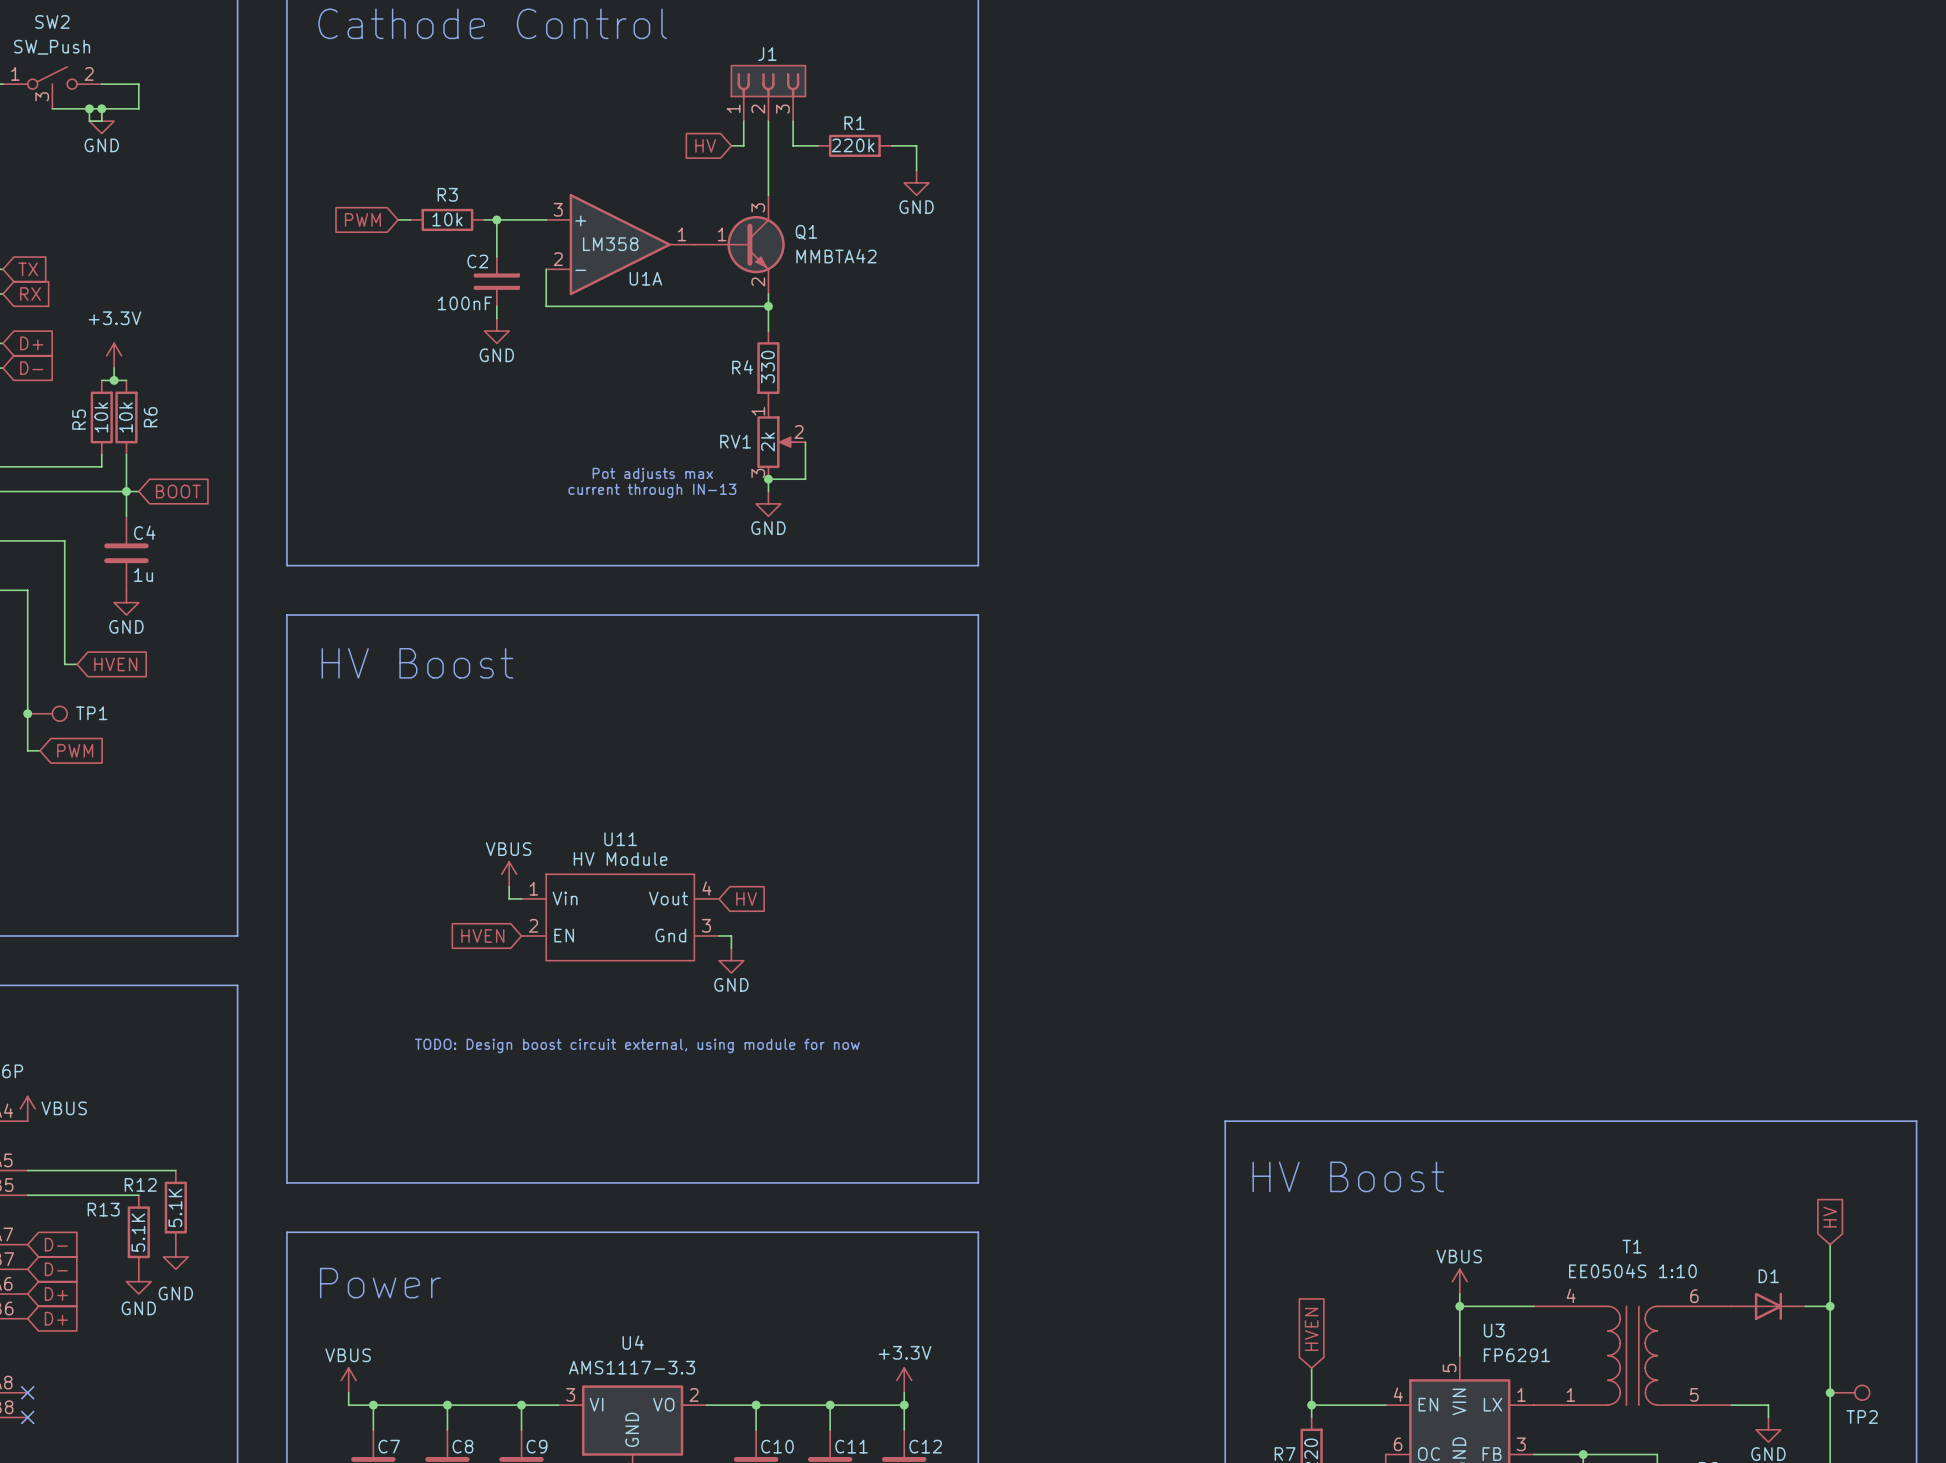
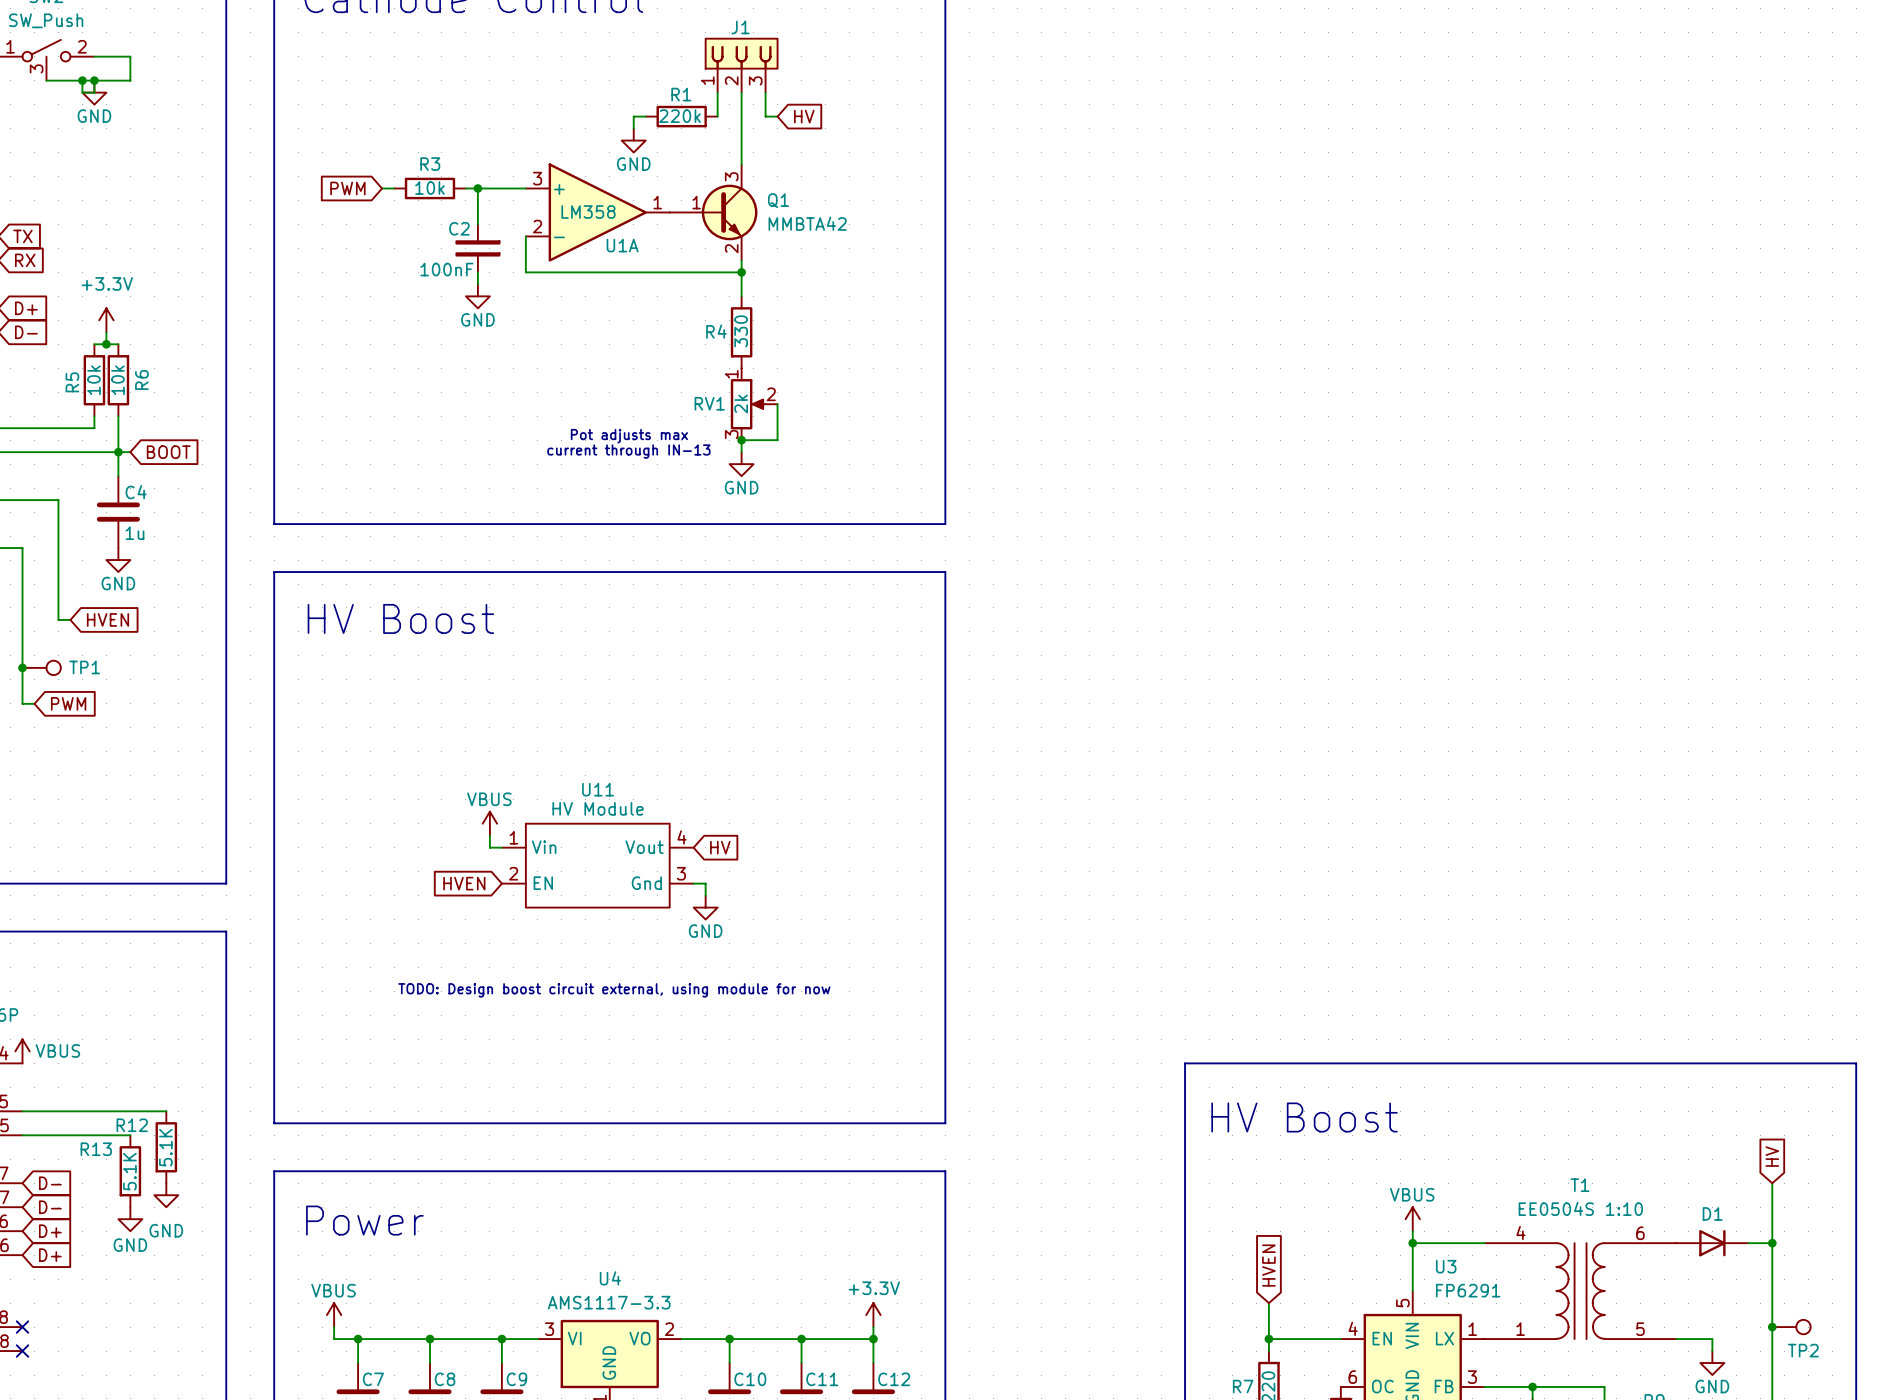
wire: none -> (645, 116) (633, 116) (633, 128)
global label rotation: 0° (705, 145) -> 180° (804, 116)
global label position: HV (705, 145) -> HV (804, 116)
wire: (805, 145) (817, 145) -> none
R1 position: (854, 145) -> (681, 116)
wire: (891, 145) (916, 145) (916, 170) -> none
power symbol: none -> GND (633, 140)
power symbol: GND (916, 182) -> none

